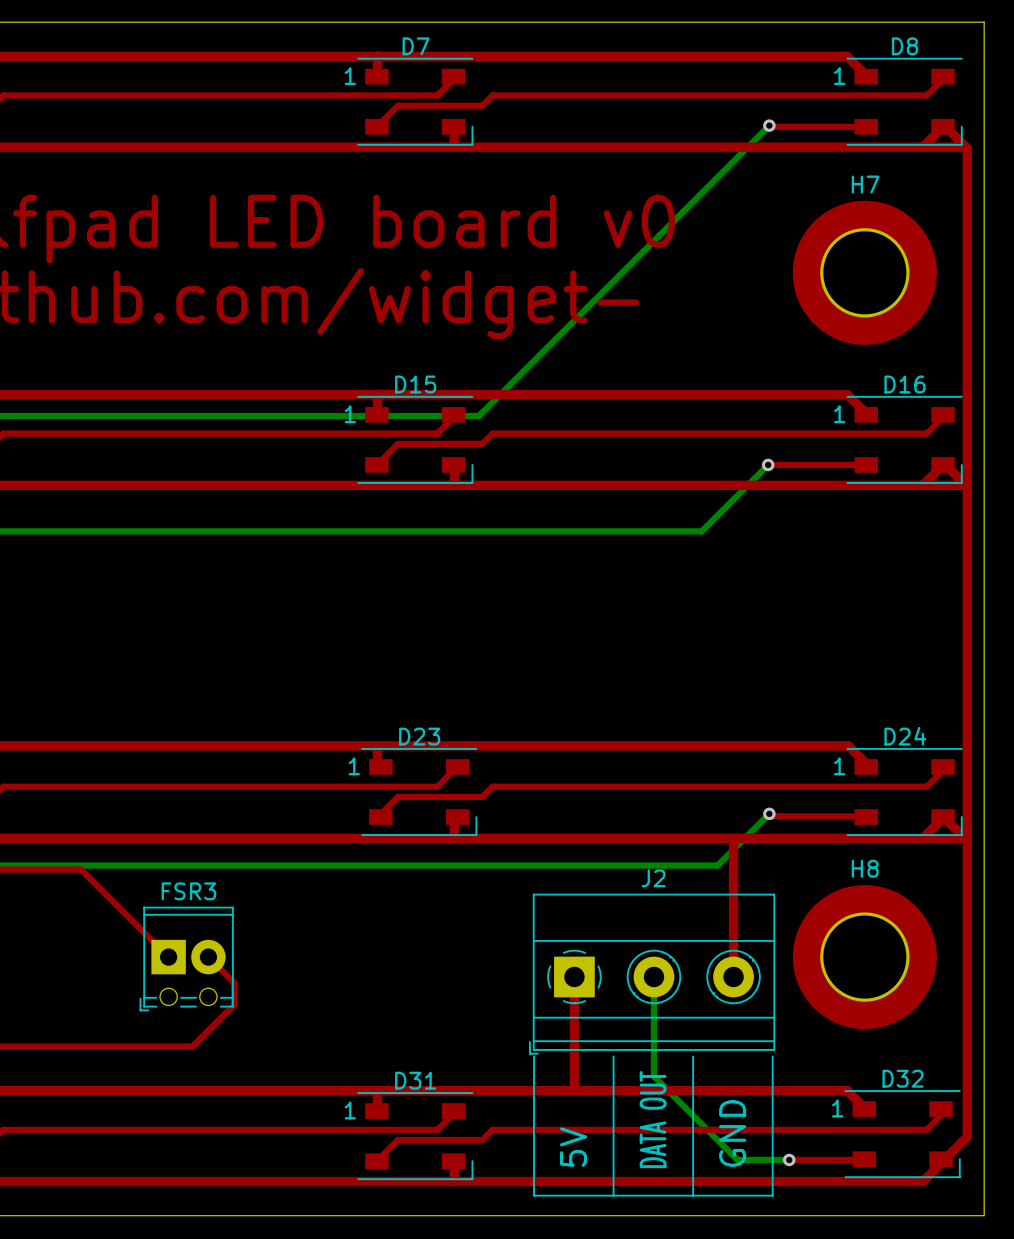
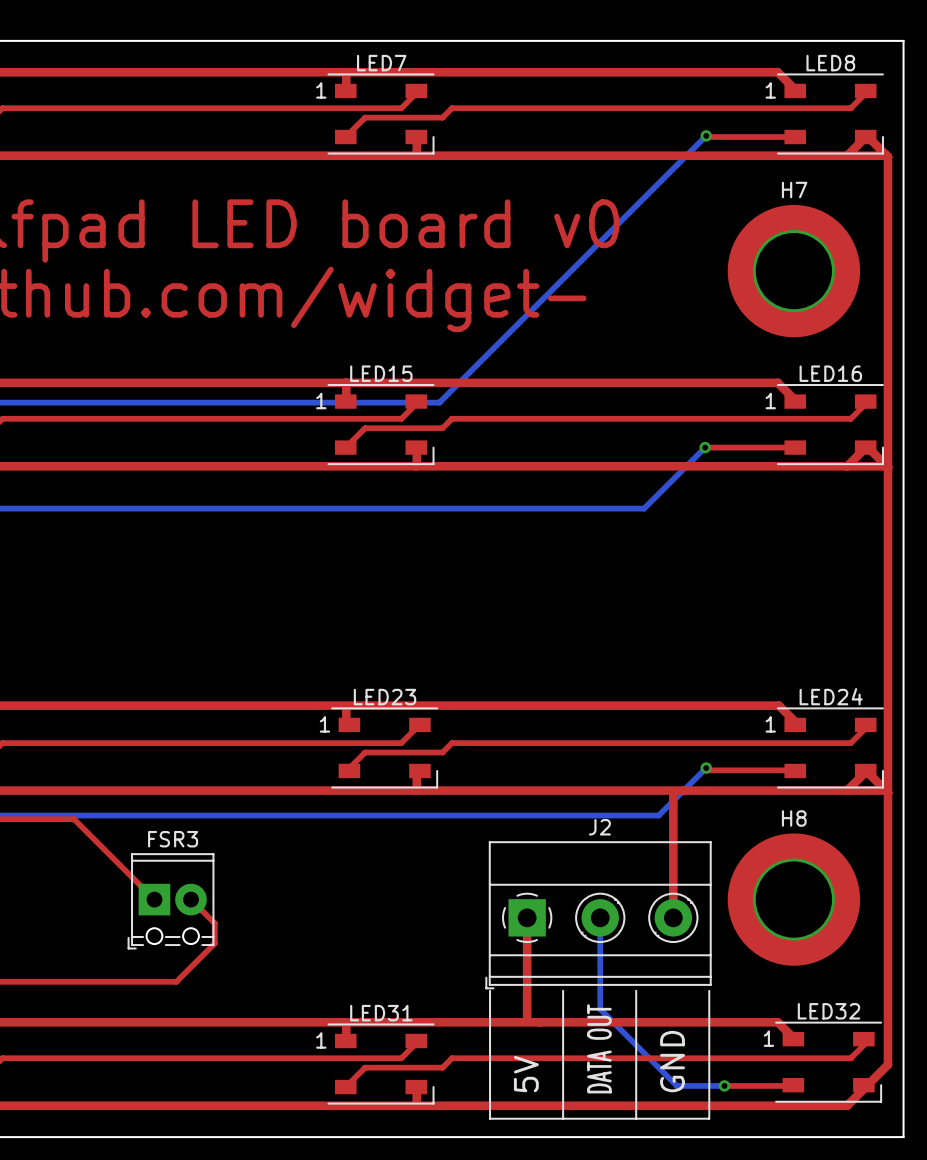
D7 name: D7 (416, 46) -> LED7 (381, 63)
D8 name: D8 (904, 46) -> LED8 (830, 63)
D15 name: D15 (415, 384) -> LED15 (381, 373)
D16 name: D16 (904, 384) -> LED16 (830, 373)
D23 name: D23 (419, 736) -> LED23 (385, 697)
D24 name: D24 (905, 736) -> LED24 (831, 696)
D32 name: D32 (903, 1078) -> LED32 (828, 1011)
D31 name: D31 (415, 1080) -> LED31 (381, 1013)

